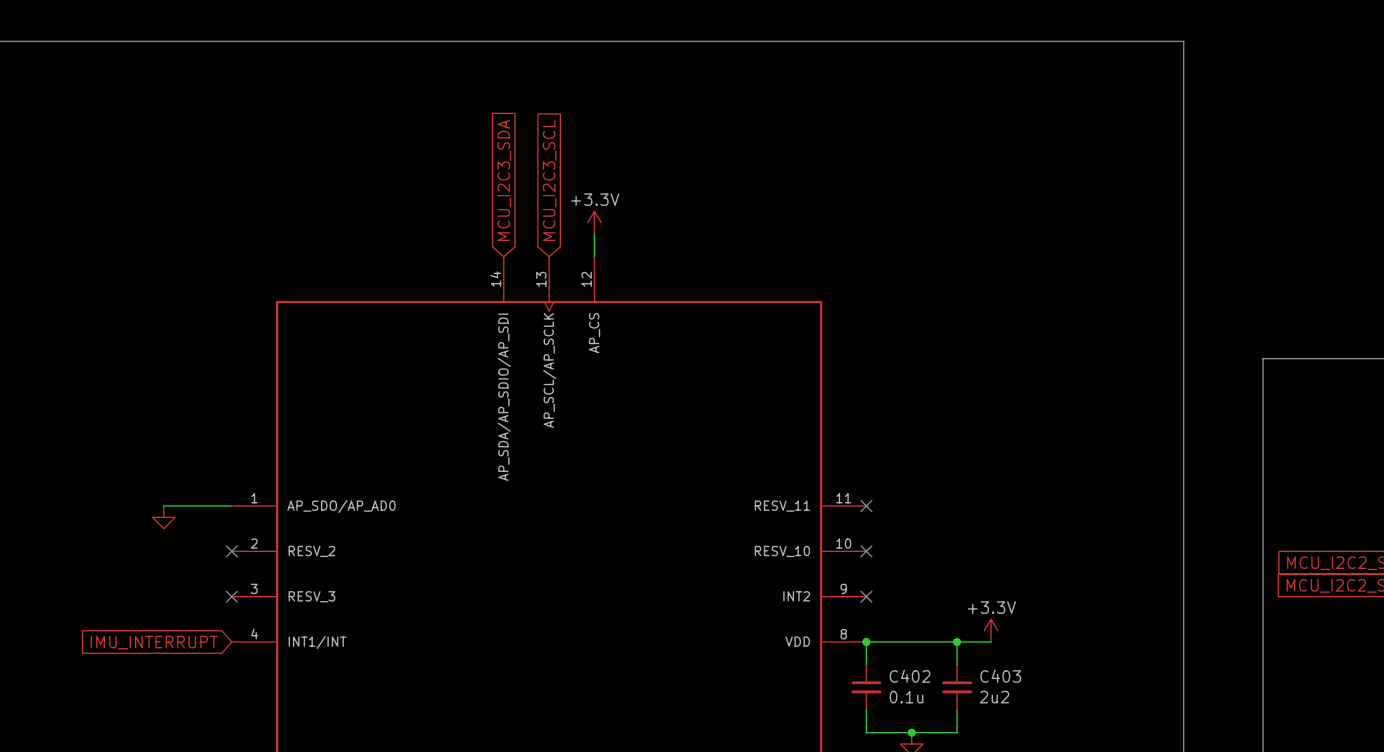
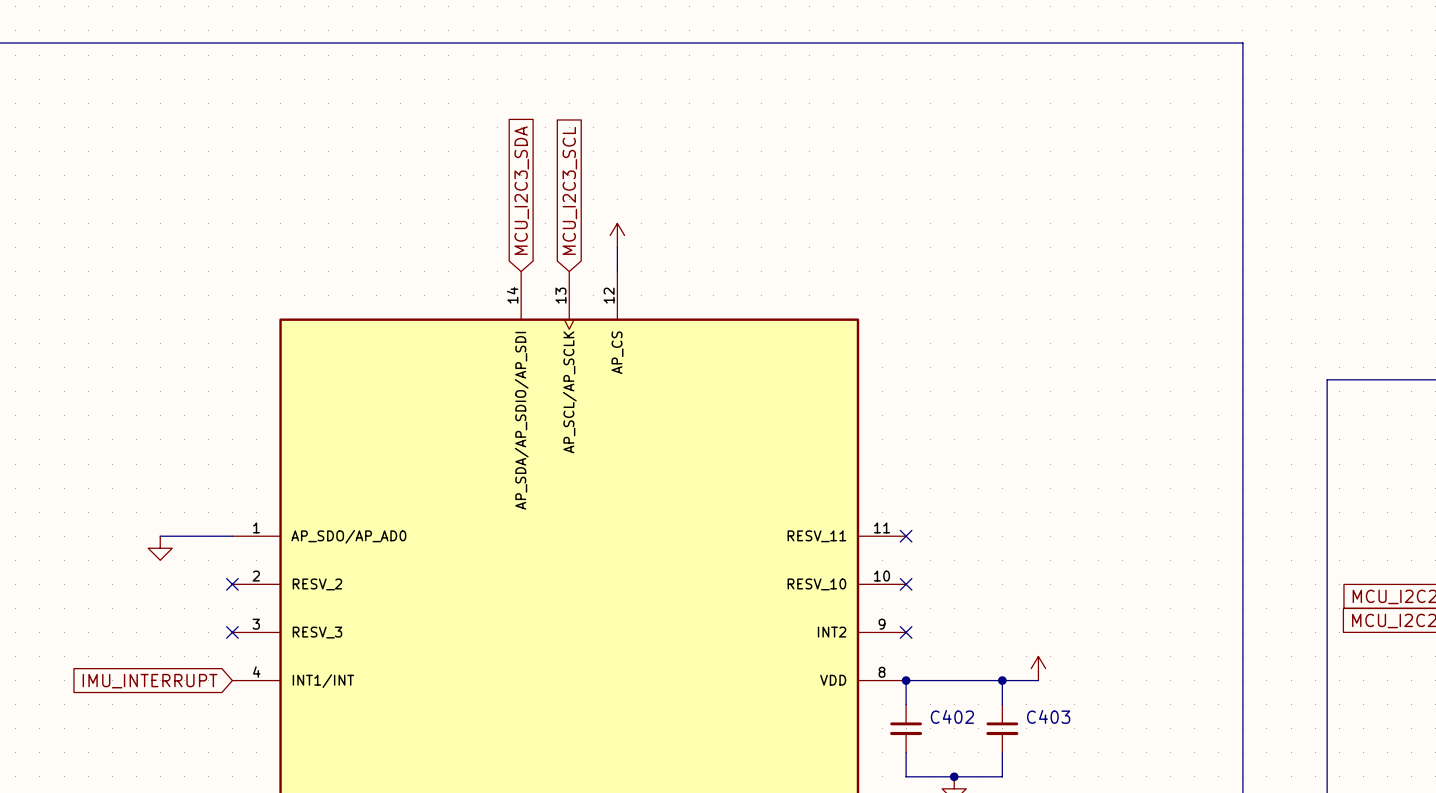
power symbol text: +3.3V (595, 199) -> none
power symbol text: +3.3V (991, 607) -> none
C402 value: 0.1u (906, 697) -> none
C403 value: 2u2 (994, 697) -> none

